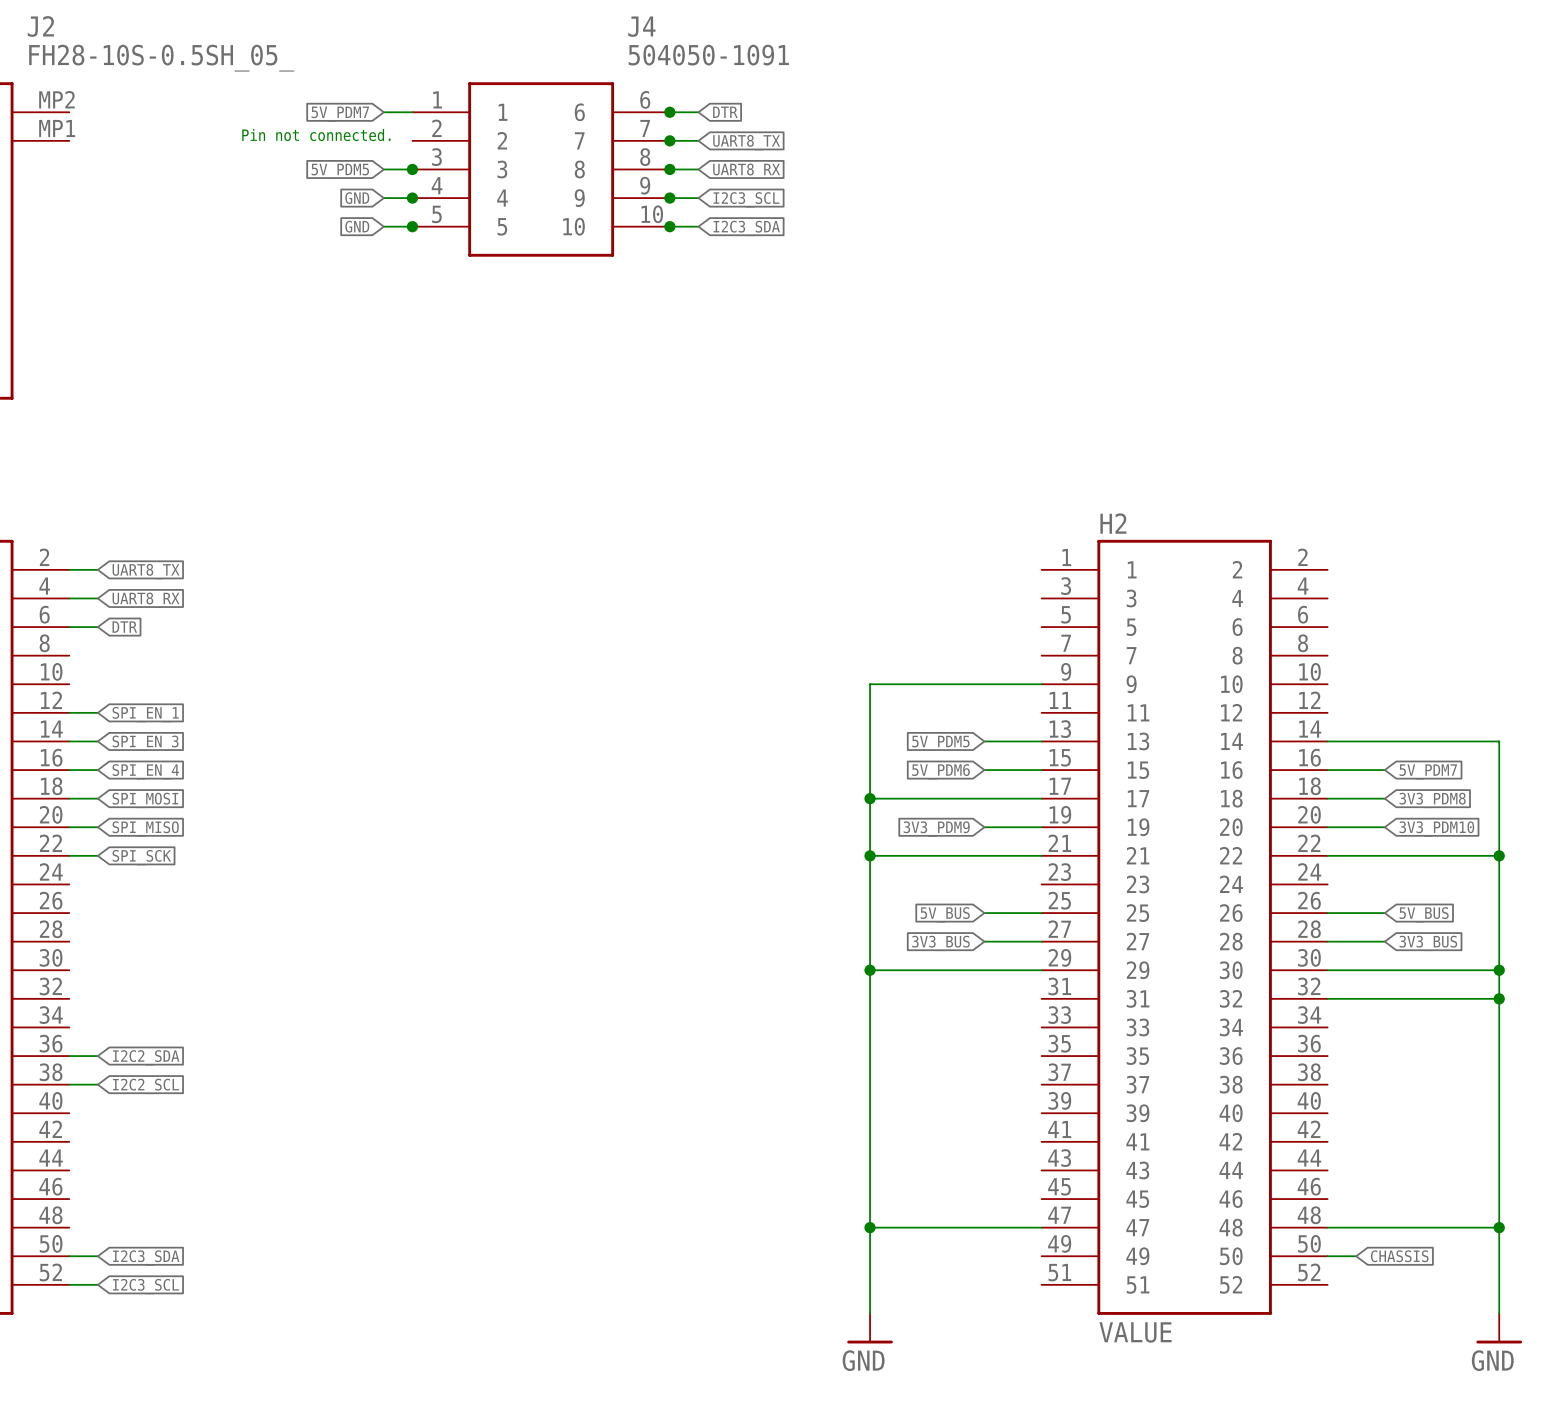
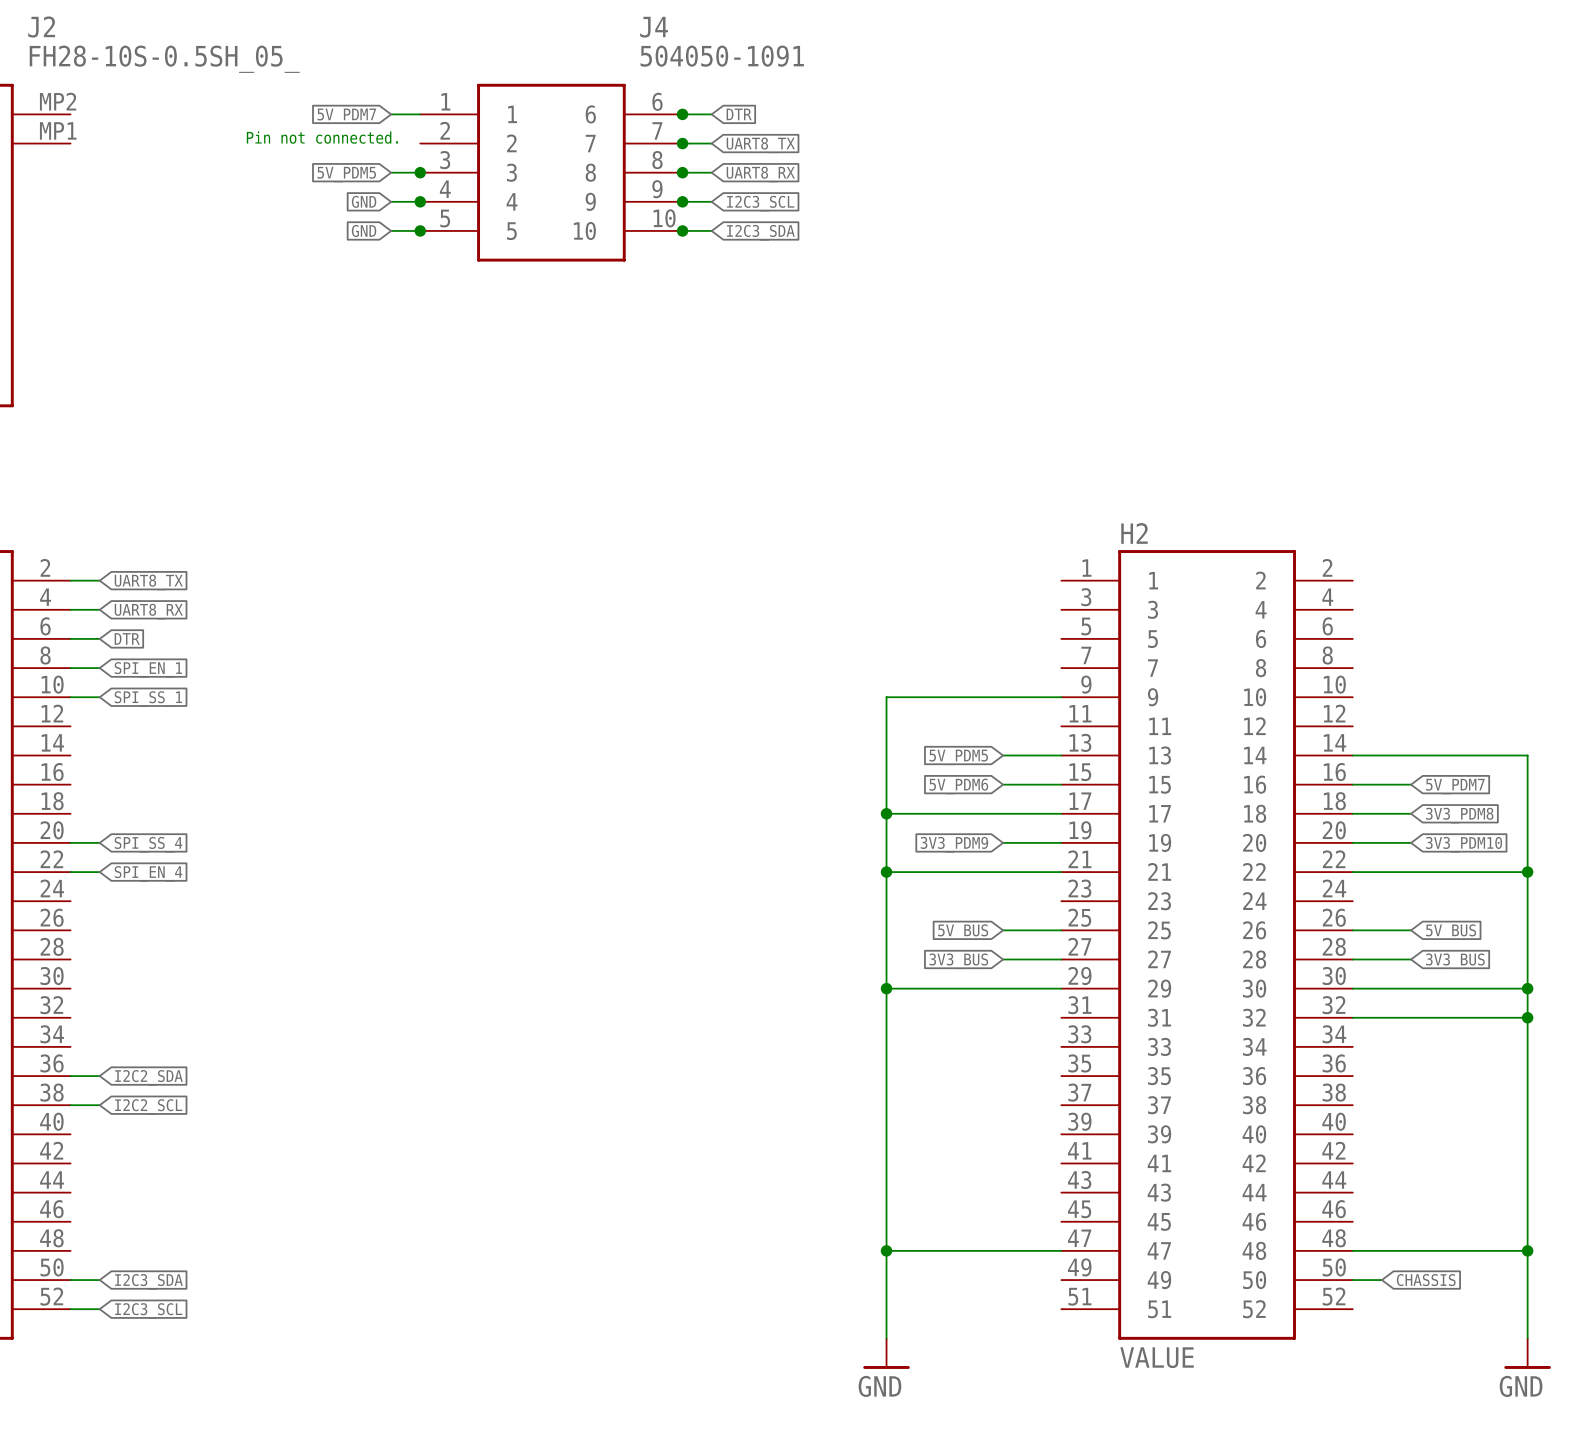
global label: none -> SPI_SS_1 (148, 699)
wire: (69, 712) (97, 712) -> (70, 668) (99, 668)
global label position: SPI_EN_1 (145, 714) -> SPI_EN_1 (148, 669)
wire: (69, 741) (97, 741) -> (70, 697) (99, 697)
global label: SPI_EN_3 (145, 743) -> none
wire: (69, 770) (97, 770) -> none
global label: SPI_EN_4 (145, 771) -> none
wire: (69, 798) (97, 798) -> none
global label: SPI_MOSI (145, 800) -> none
global label: SPI_MISO (145, 829) -> SPI_SS_4 (148, 844)
global label: SPI_SCK (141, 857) -> SPI_EN_4 (148, 873)

